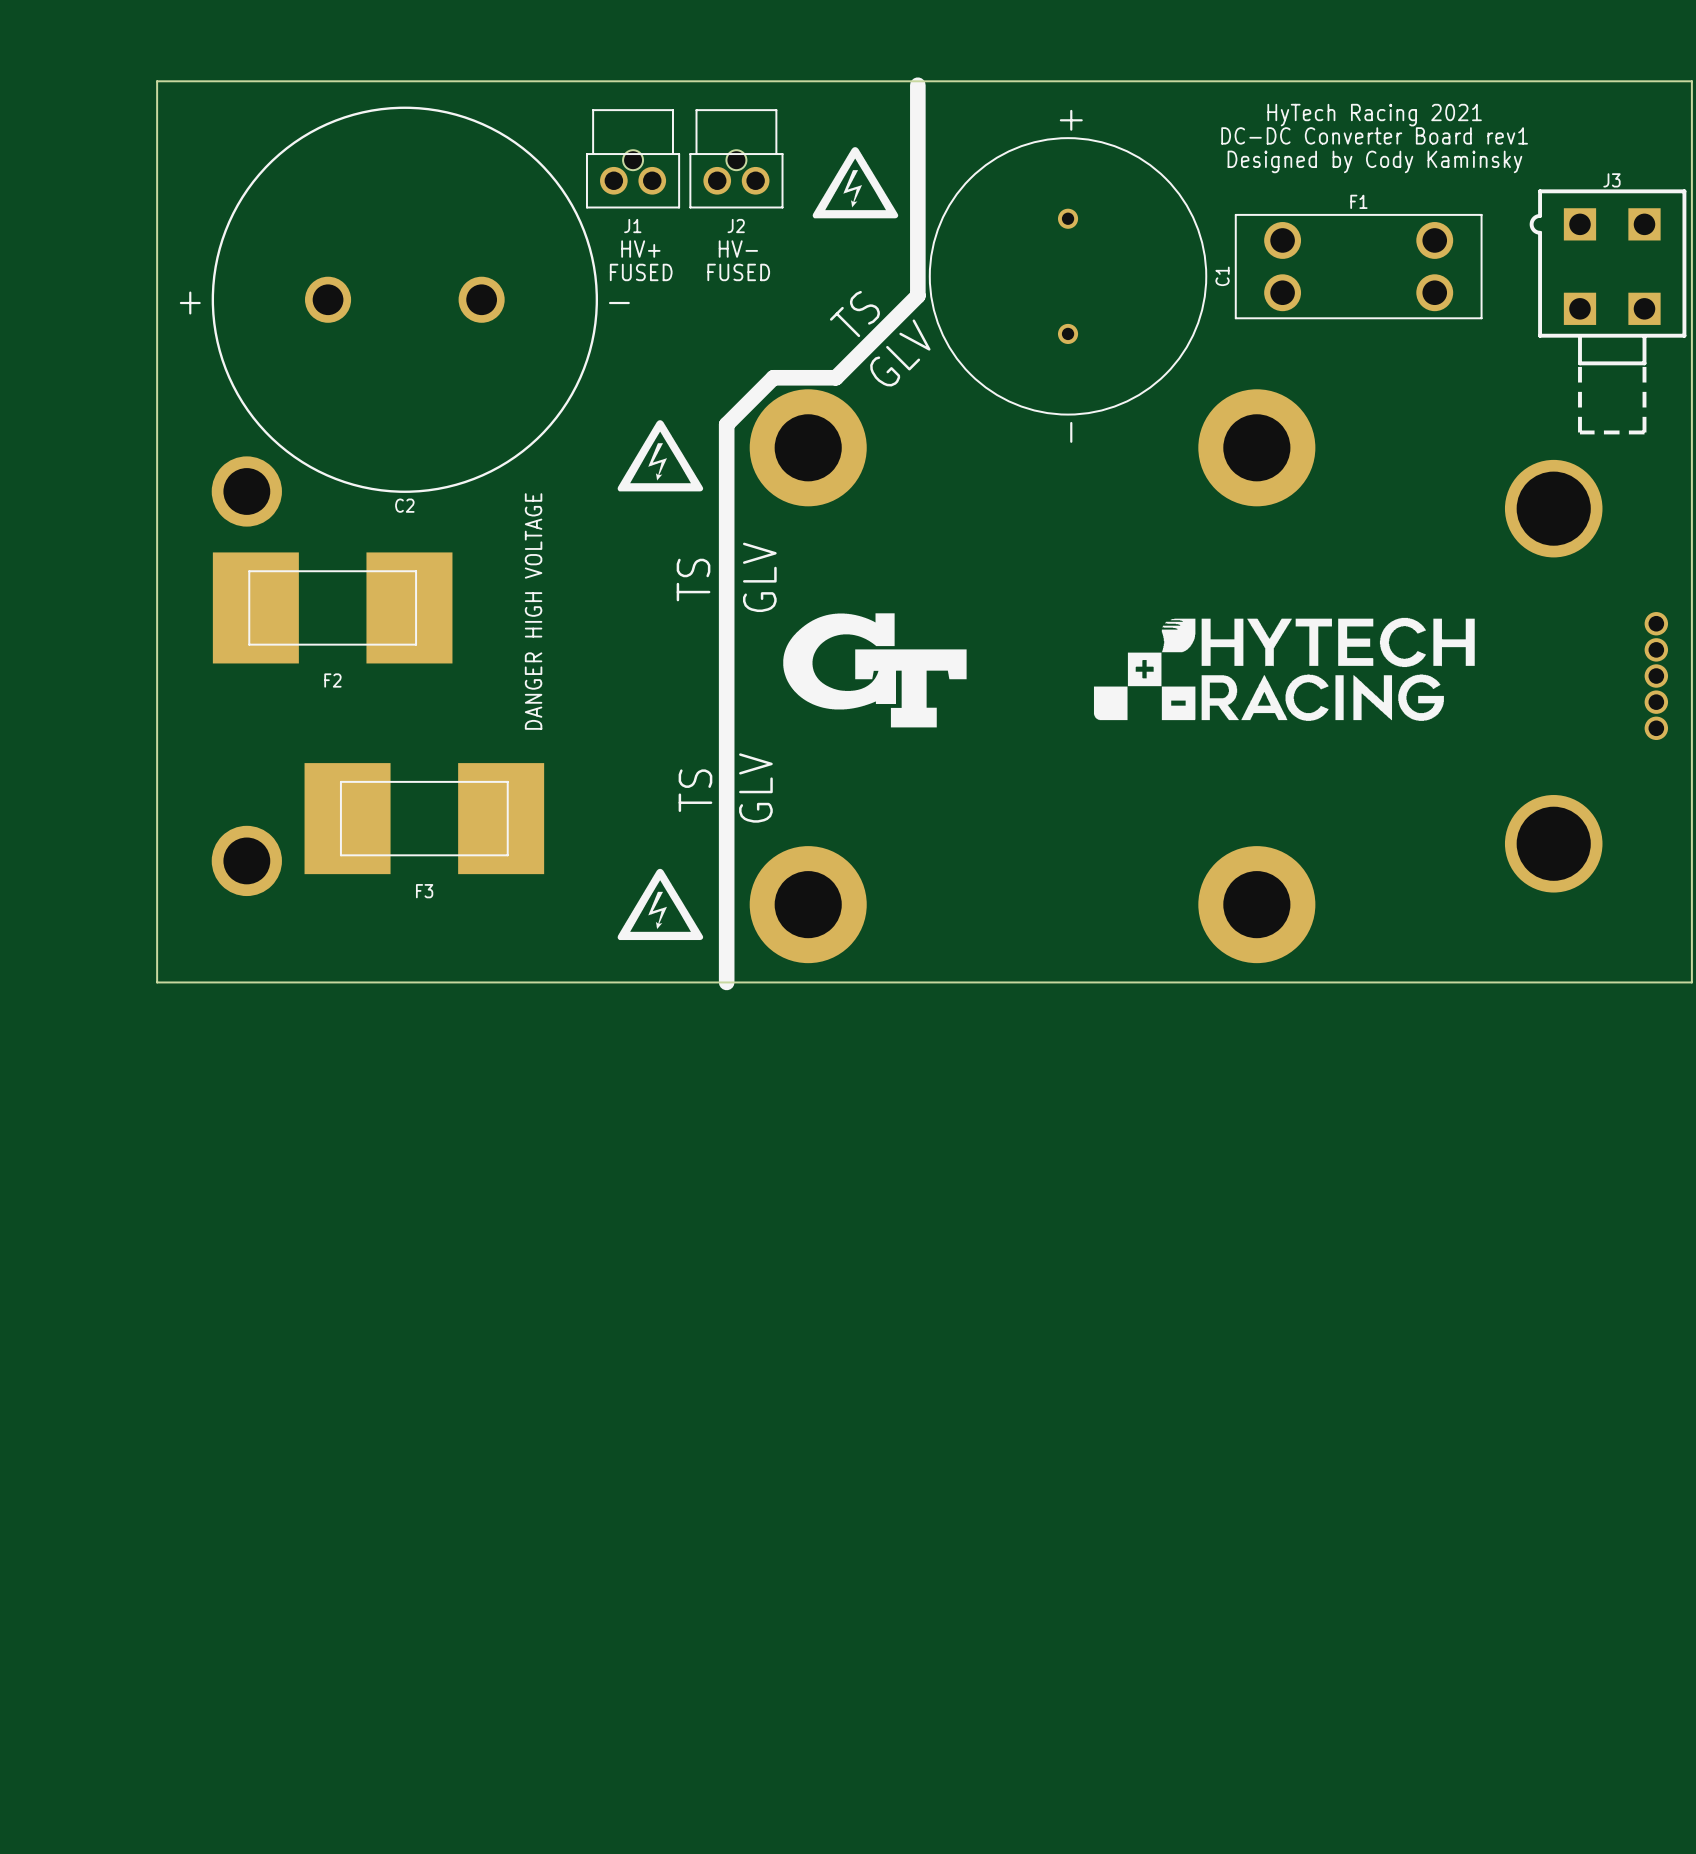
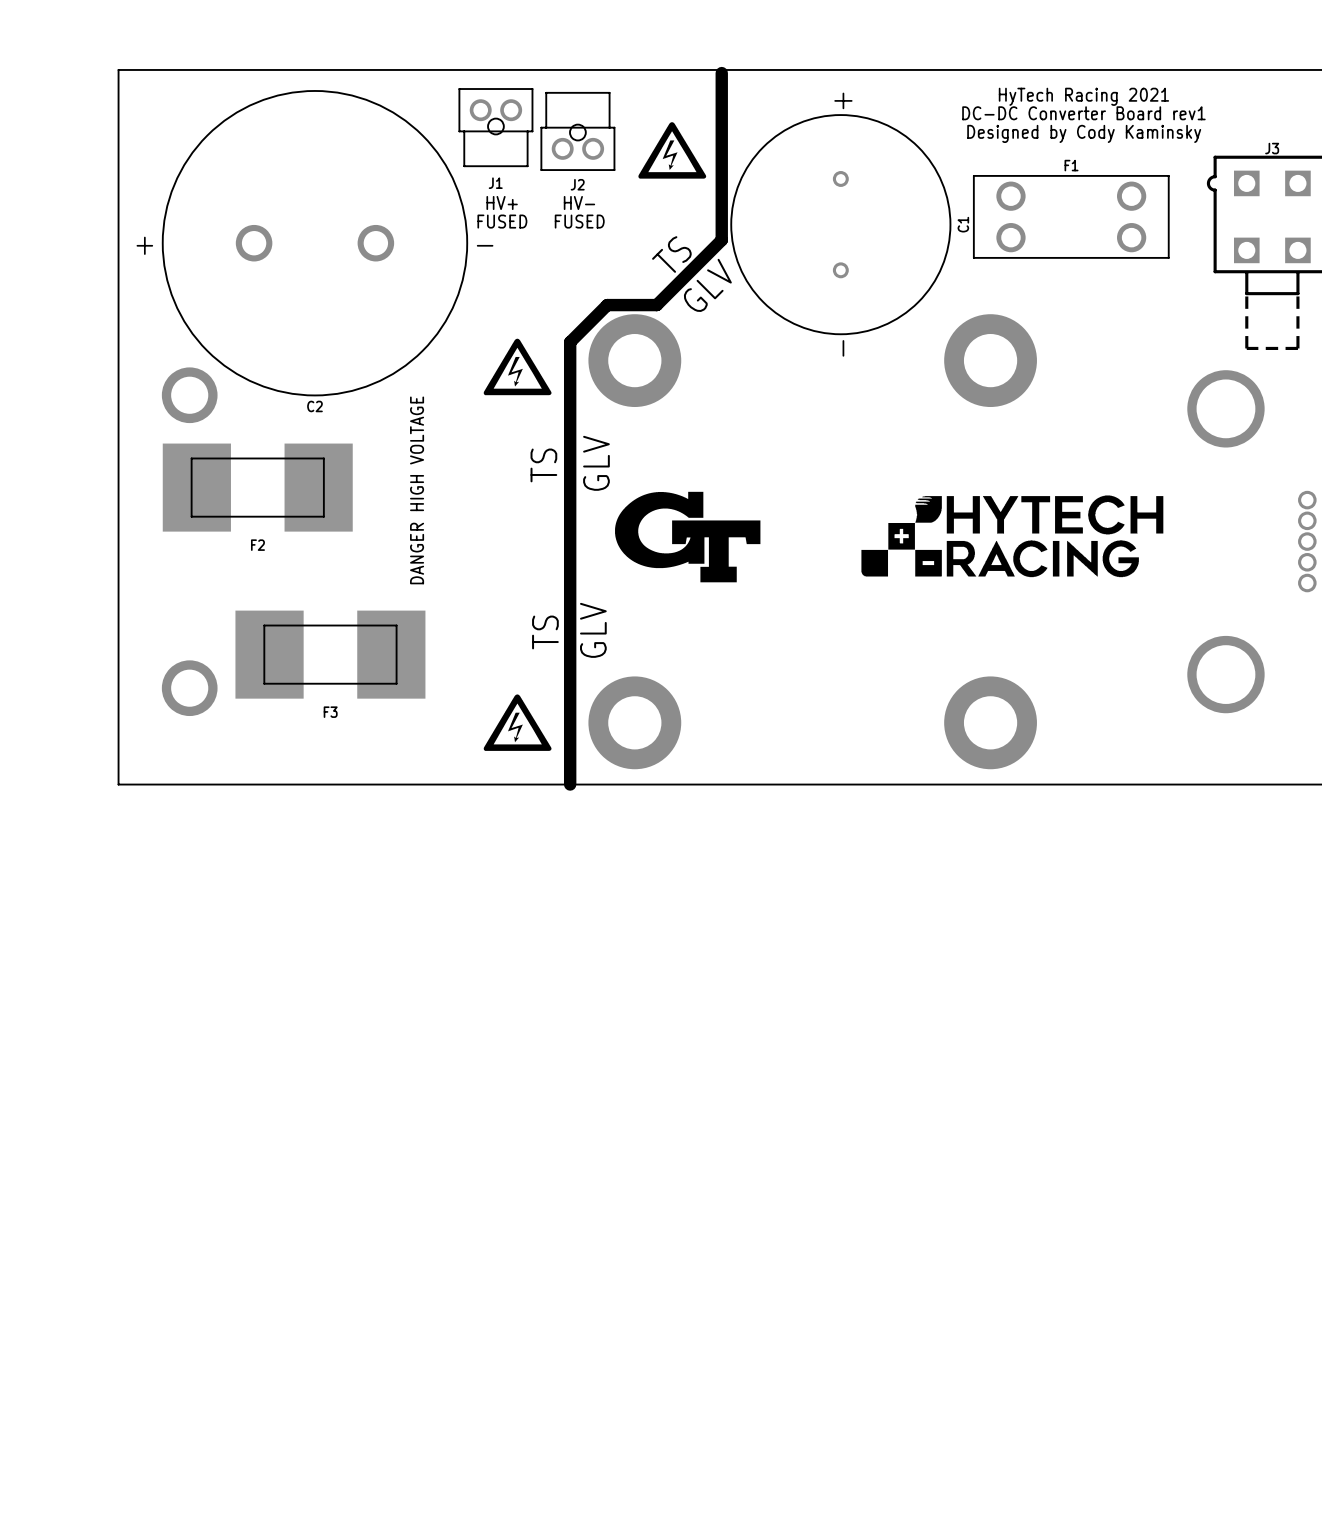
J1 rotation: 0° (633, 158) -> 180° (495, 127)

